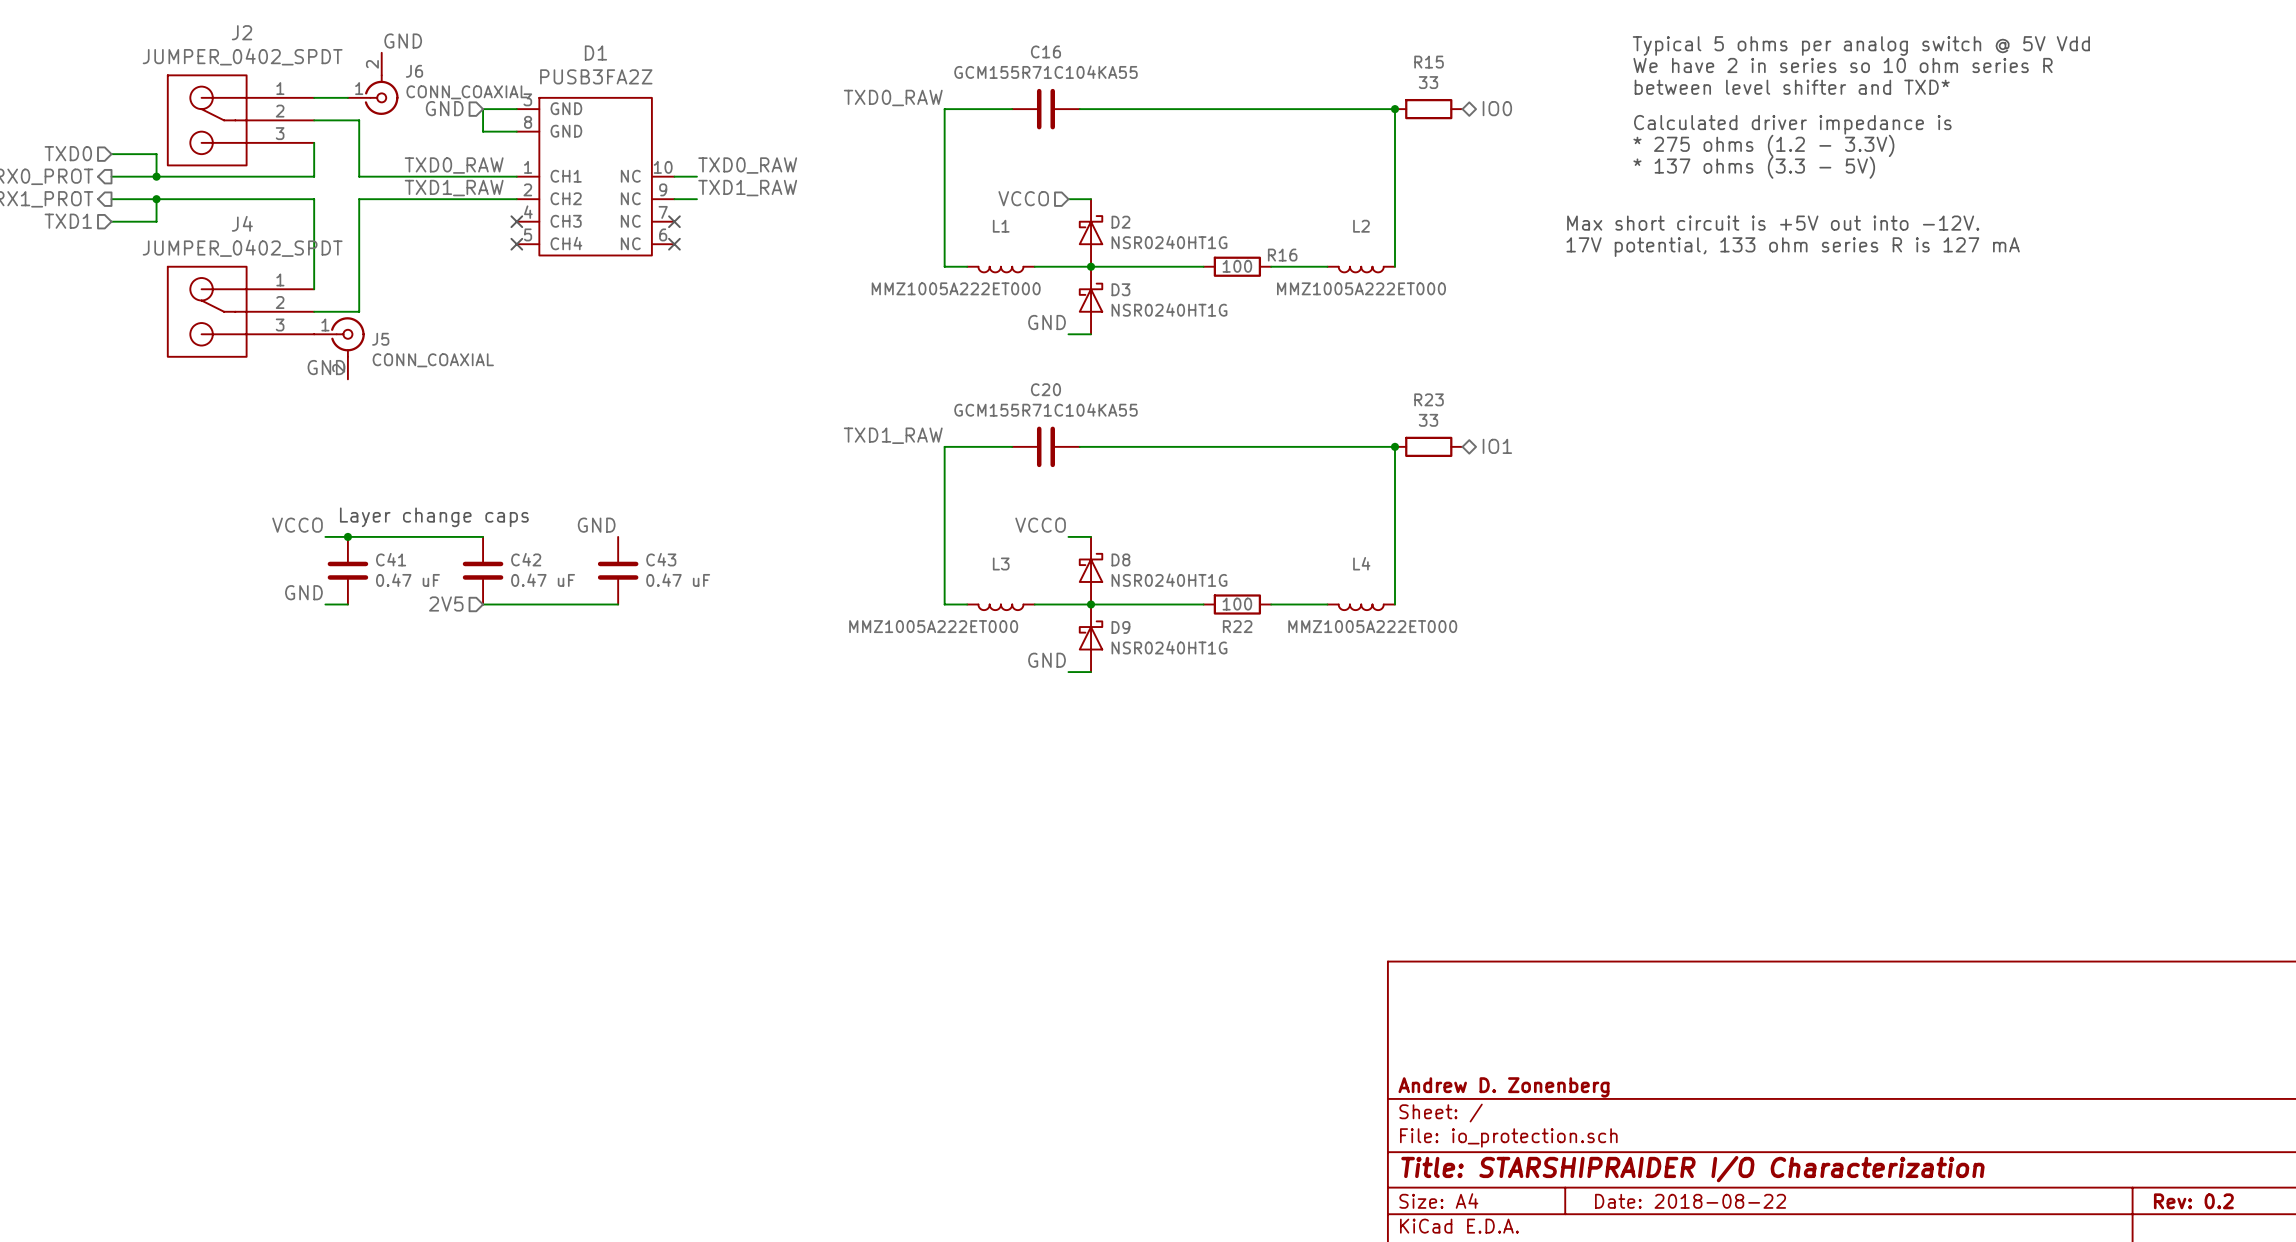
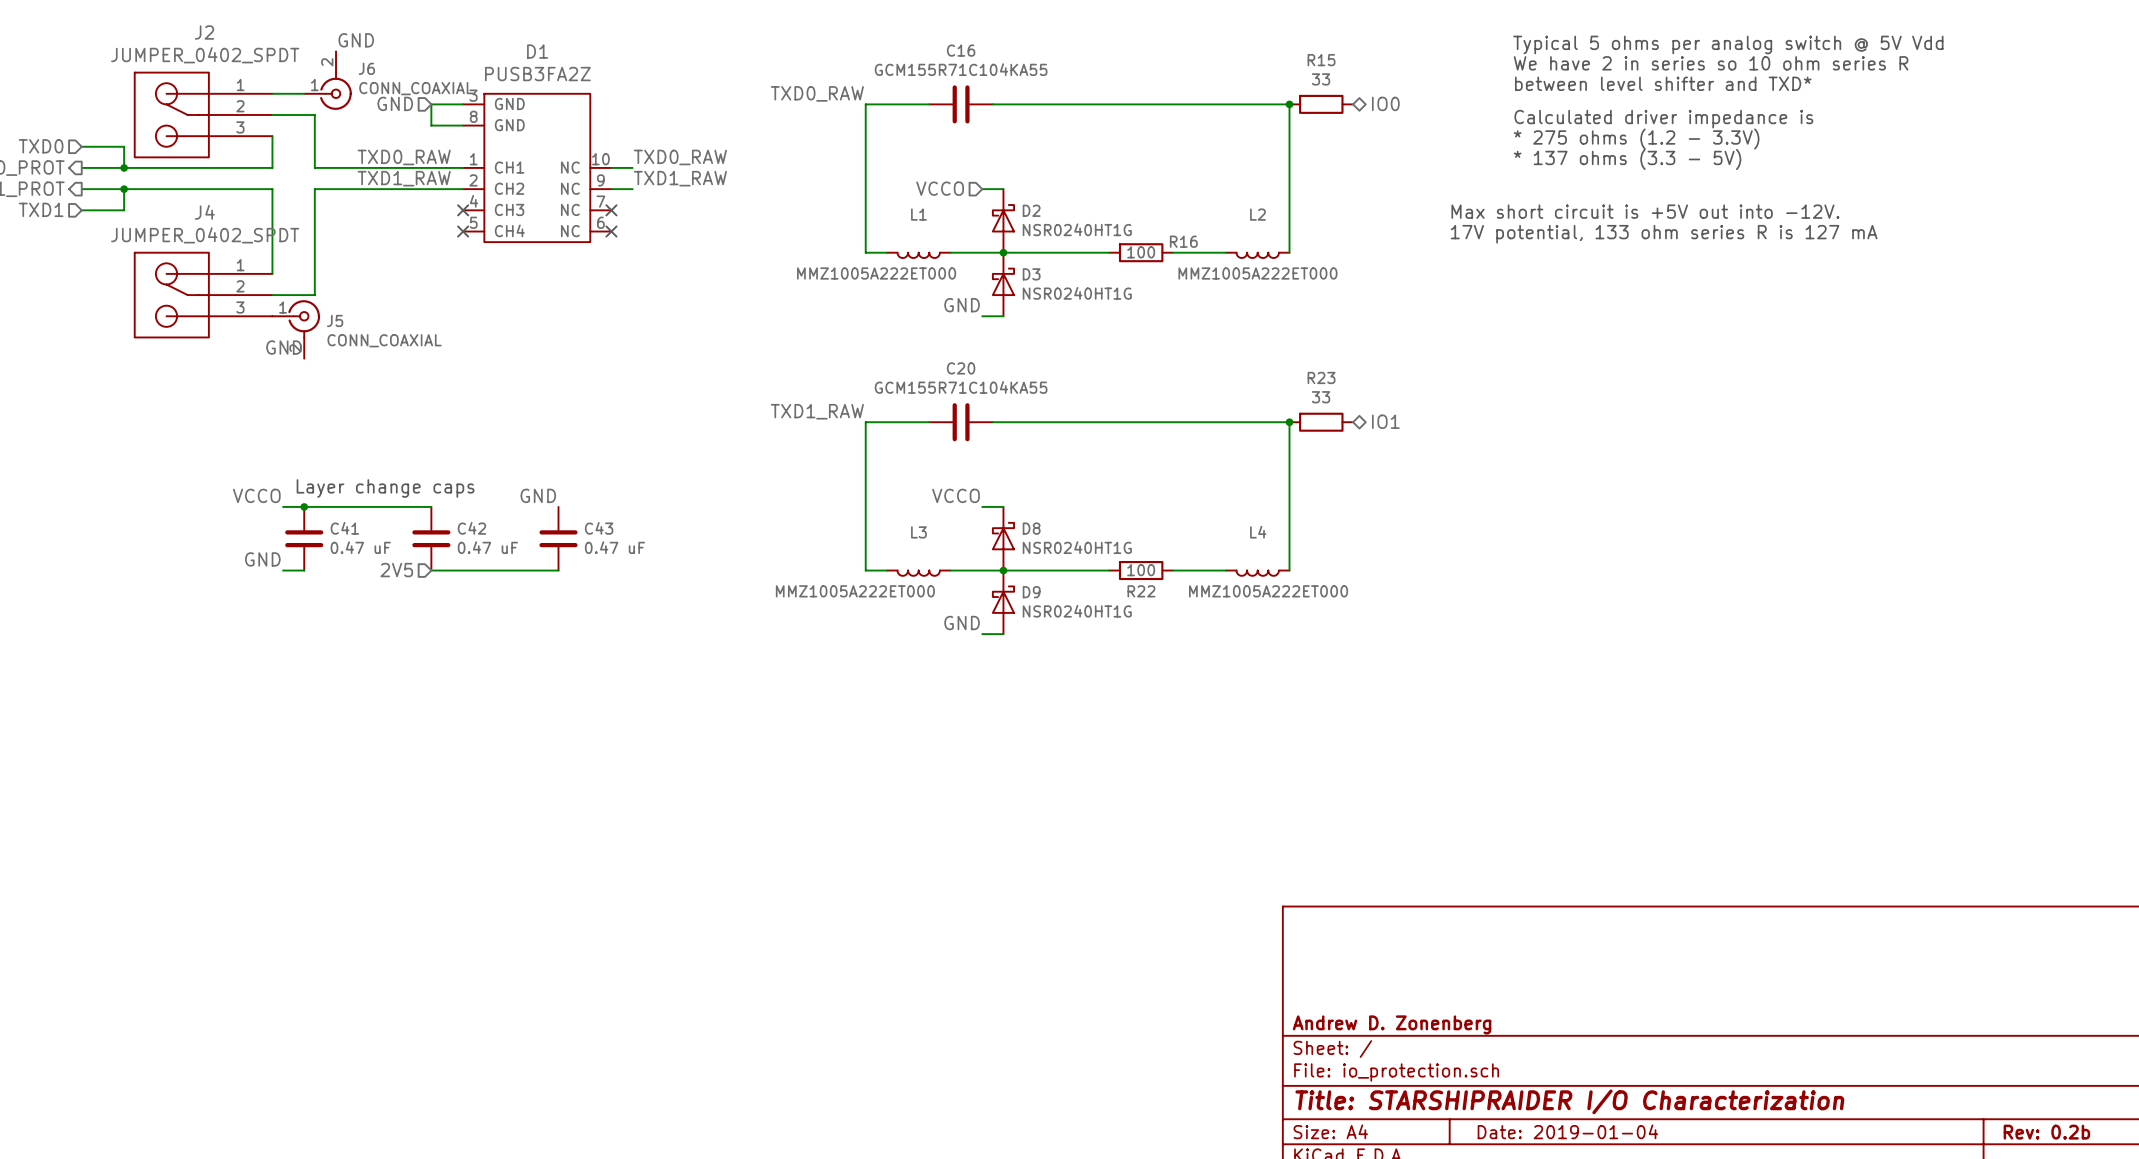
title block: Date: 2018-08-22 (1690, 1201) -> Date: 2019-01-04 (1567, 1131)
title block: Rev: 0.2 (2193, 1201) -> Rev: 0.2b (2046, 1132)

